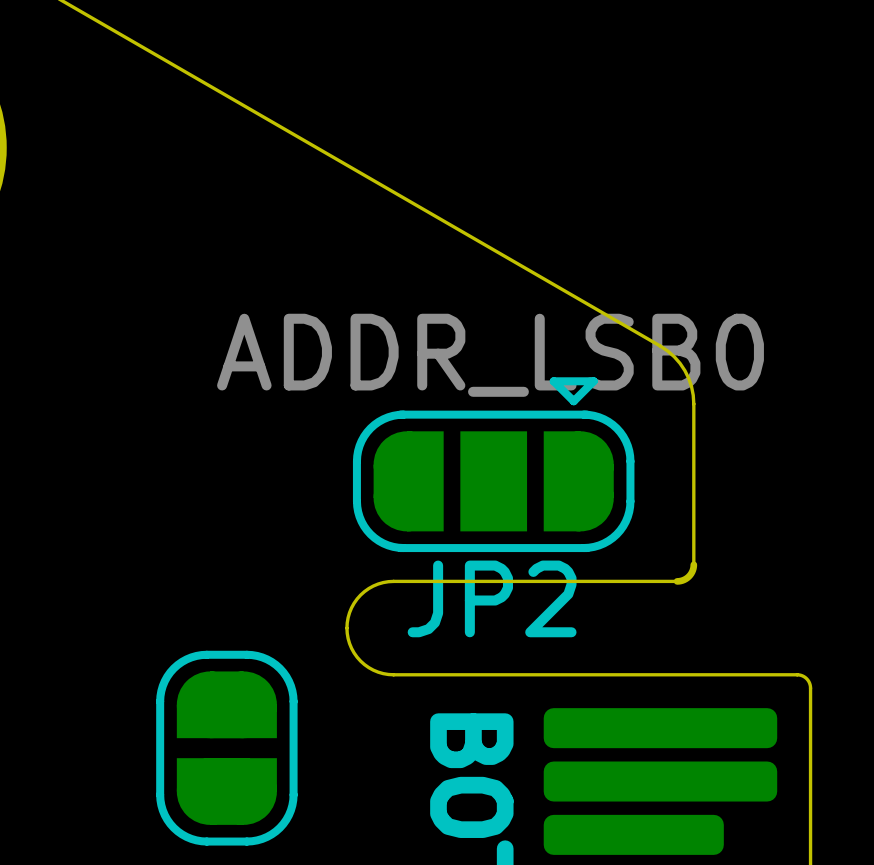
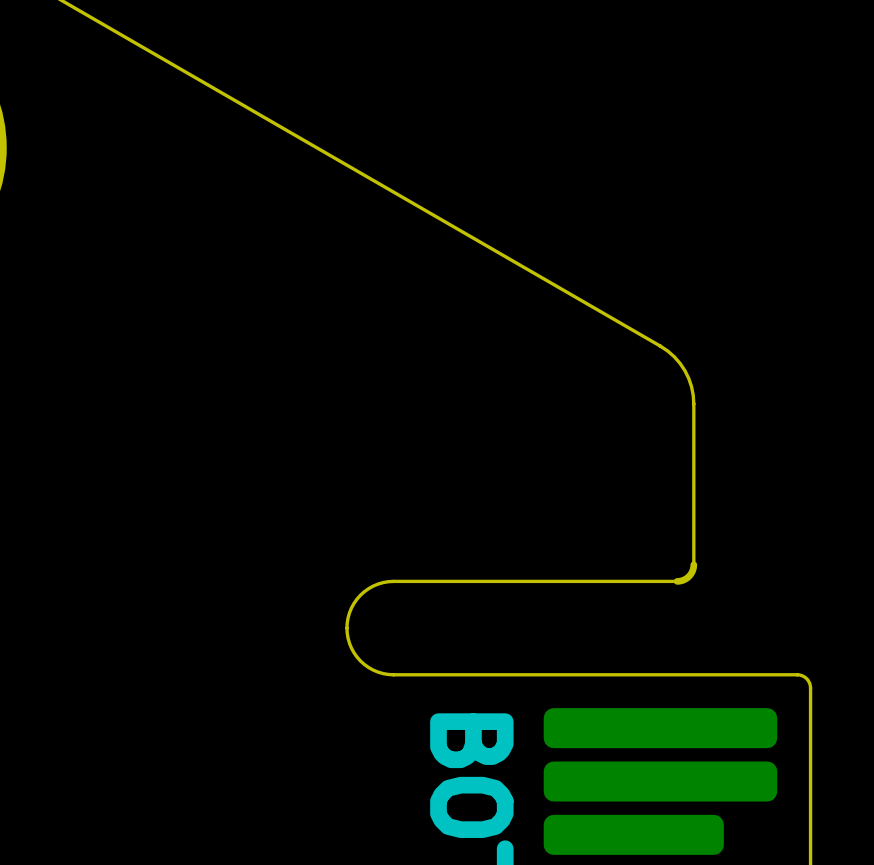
JP2: ADDR_LSB0 (493, 464) -> none
part: (226, 748) -> none

